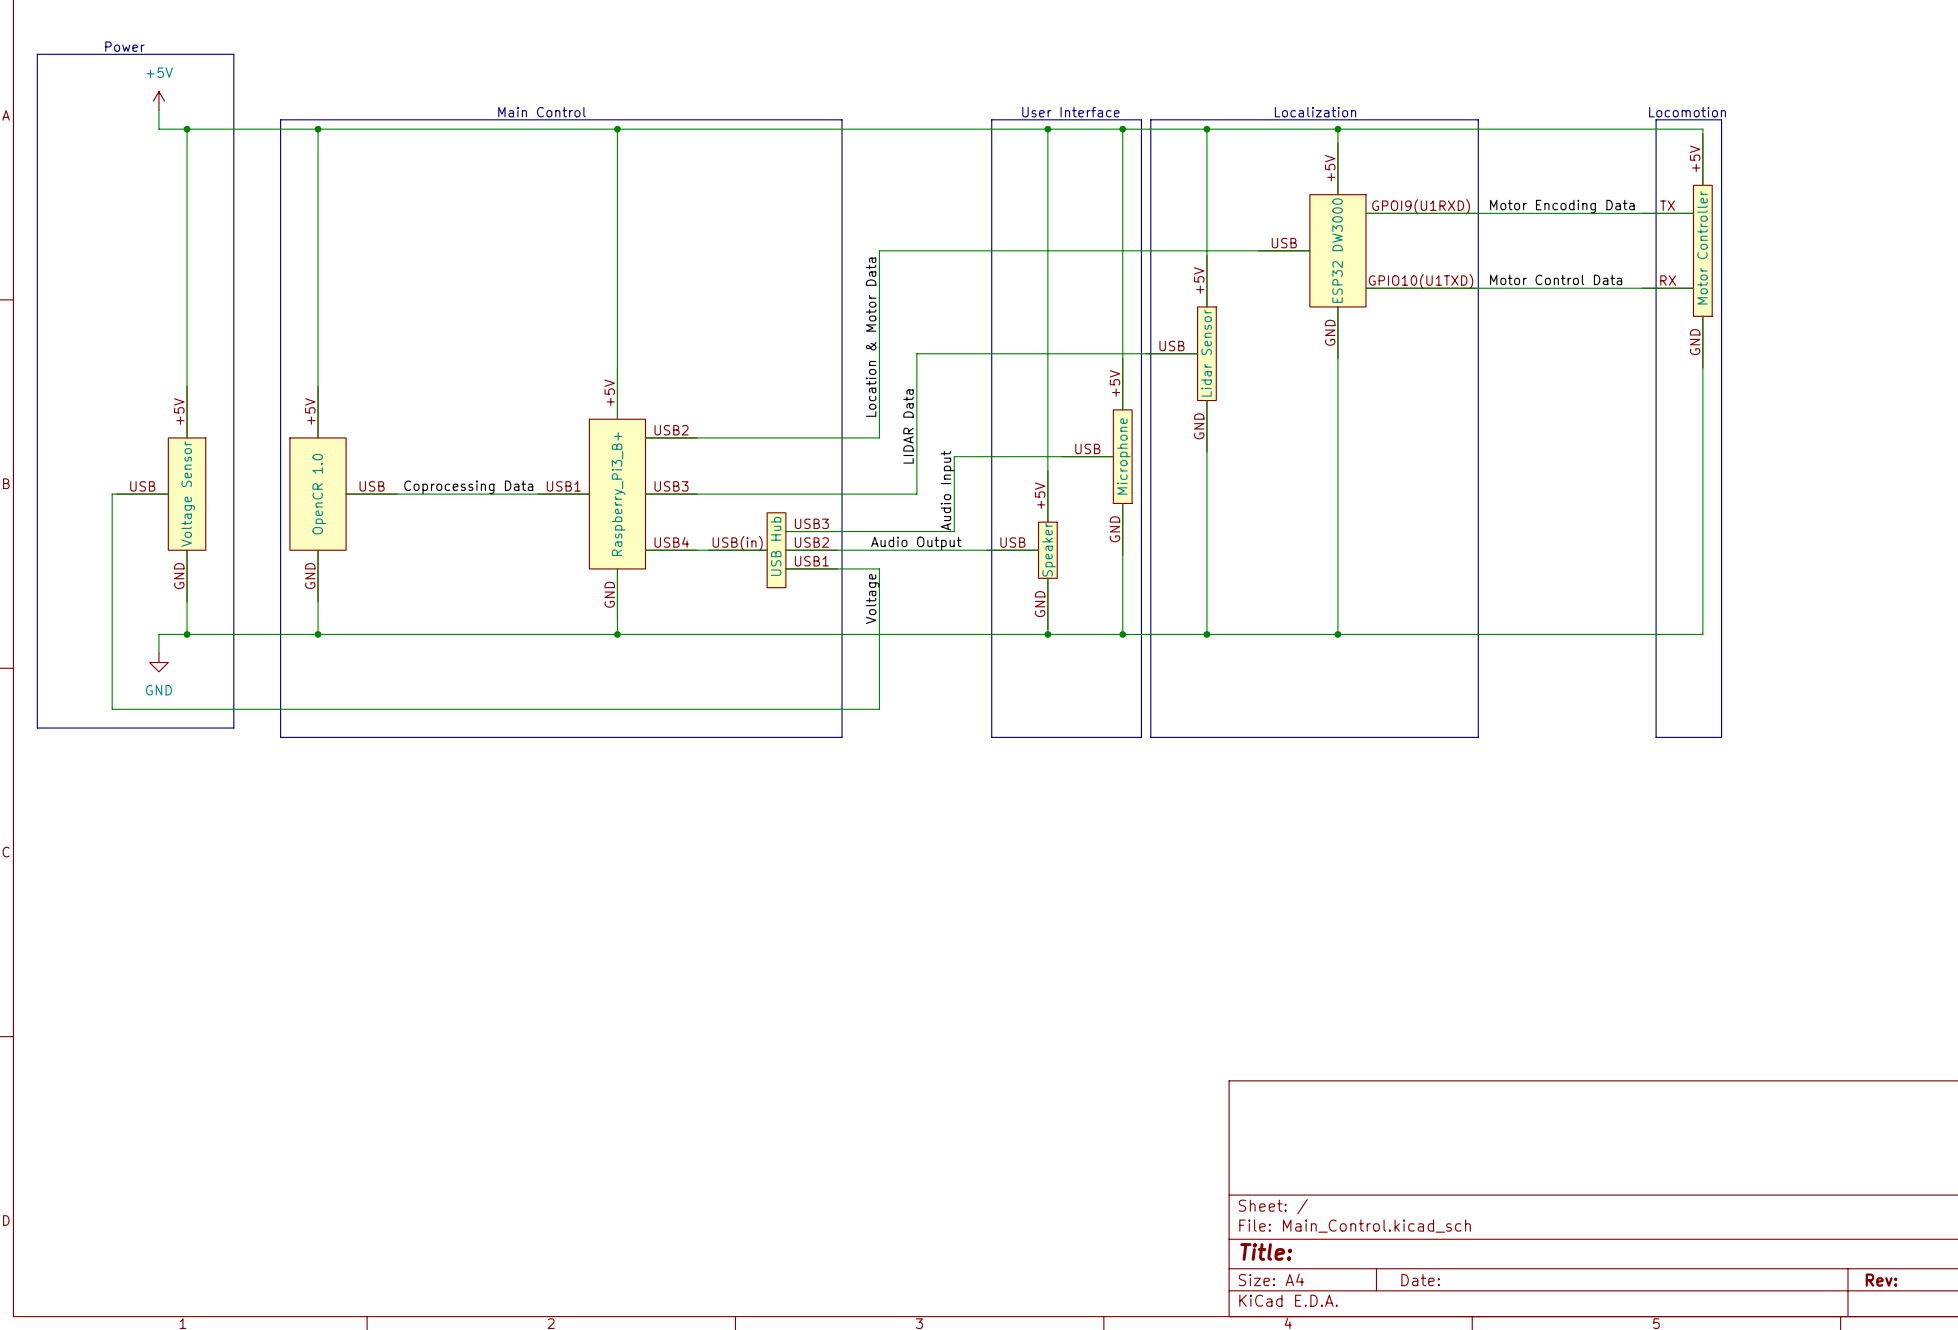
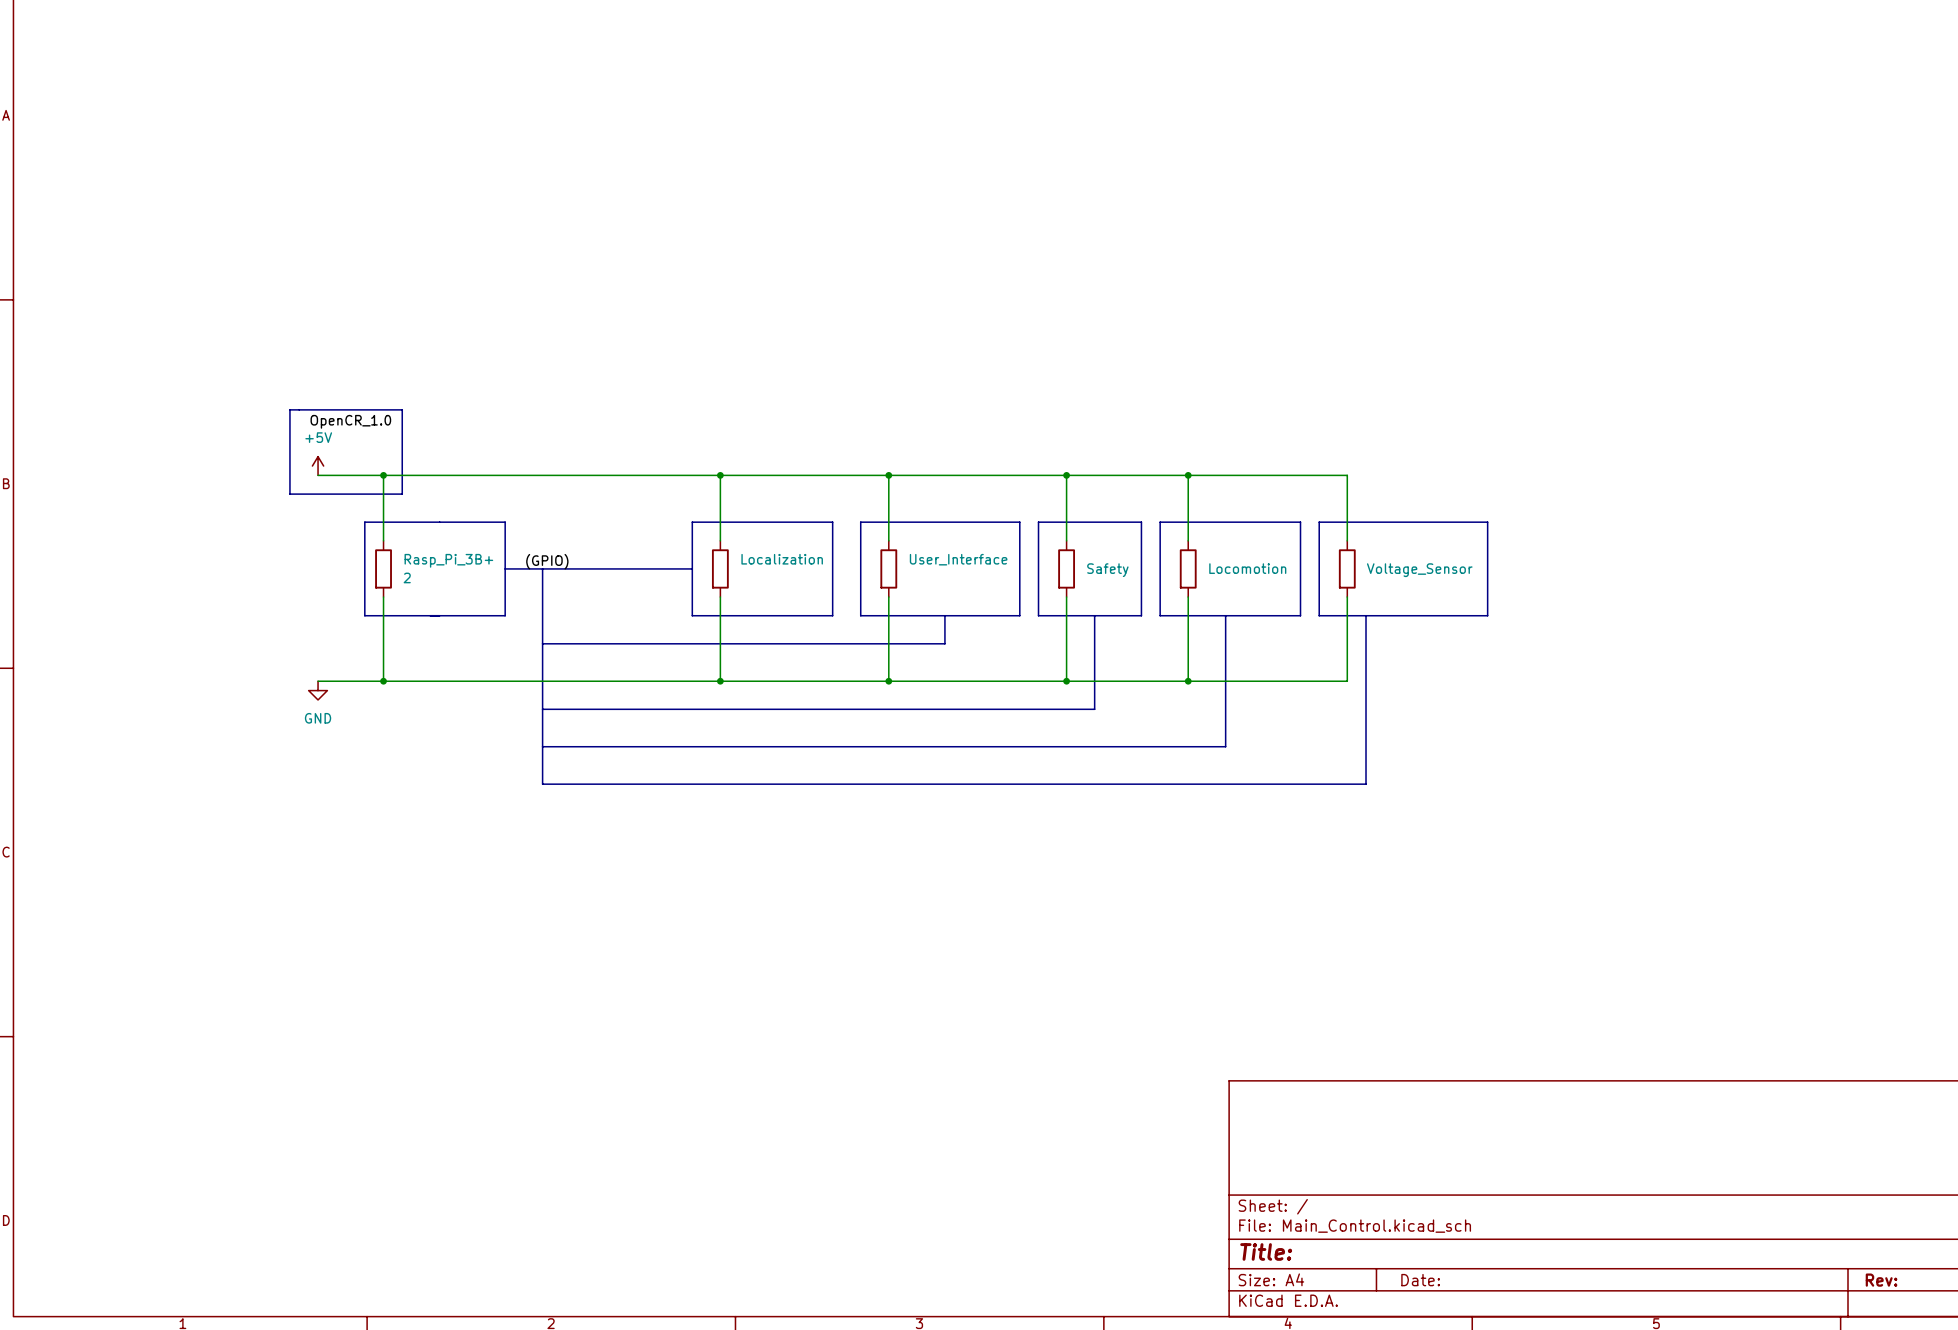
text: Power (124, 46) -> none
line: (37, 54) (233, 54) (233, 728) (37, 728) (37, 54) -> none
power symbol: +5V (158, 101) -> none
wire: (158, 110) (158, 129) (1702, 129) (1702, 185) -> none
text: Main Control (542, 112) -> none
text: User Interface (1070, 112) -> none
text: Localization (1315, 112) -> none
text: Locomotion (1687, 112) -> none
line: (280, 119) (842, 119) (842, 737) (280, 737) (280, 119) -> none
line: (1150, 119) (1478, 119) (1478, 737) (1150, 737) (1150, 119) -> none
line: (1656, 119) (1656, 737) (1721, 737) (1721, 119) (1656, 119) -> none
wire: (187, 129) (187, 437) -> none
junction: (187, 129) -> none
wire: (318, 129) (318, 437) -> none
junction: (318, 129) -> none
wire: (617, 129) (617, 419) -> none
junction: (617, 129) -> none
wire: (1047, 129) (1047, 522) -> none
junction: (1047, 129) -> none
wire: (1122, 129) (1122, 409) -> none
junction: (1122, 129) -> none
wire: (1206, 129) (1206, 306) -> none
junction: (1206, 129) -> none
wire: (1337, 129) (1337, 194) -> none
junction: (1337, 129) -> none
label: Motor Encoding Data (1562, 206) -> none
wire: (1366, 213) (1693, 213) -> none
wire: (1309, 250) (879, 250) (879, 437) (645, 437) -> none
part: ESP32 DW3000 (1367, 250) -> none
part: Motor Controller (1677, 250) -> none
label: Motor Control Data (1556, 279) -> none
wire: (1366, 288) (1693, 288) -> none
wire: (1337, 306) (1337, 634) -> none
wire: (1702, 316) (1702, 634) (158, 634) (158, 653) -> none
label: Location & Motor Data (871, 337) -> none
part: Lidar Sensor (1181, 353) -> none
wire: (1197, 353) (916, 353) (916, 494) (645, 494) -> none
wire: (1206, 400) (1206, 634) -> none
line: none -> (289, 409) (402, 409) (402, 494) (289, 494) (289, 409)
label: none -> OpenCR_1.0 (350, 421)
label: LIDAR Data (908, 426) -> none
part: Microphone (1096, 456) -> none
wire: (1113, 456) (954, 456) (954, 531) (785, 531) -> none
power symbol: none -> +5V (318, 466)
wire: none -> (318, 475) (1347, 475) (1347, 540)
wire: none -> (383, 475) (383, 540)
junction: none -> (383, 475)
junction: none -> (720, 475)
wire: none -> (888, 475) (888, 540)
junction: none -> (888, 475)
wire: none -> (1066, 475) (1066, 540)
junction: none -> (1066, 475)
wire: none -> (1188, 475) (1188, 540)
junction: none -> (1188, 475)
label: Coprocessing Data (468, 487) -> none
label: Audio Input (947, 490) -> none
part: Voltage Sensor (161, 494) -> none
wire: (168, 494) (112, 494) (112, 709) (879, 709) (879, 568) (785, 568) -> none
part: OpenCR 1.0 (343, 494) -> none
wire: (346, 494) (589, 494) -> none
part: Raspberry_Pi3_B+ (617, 494) -> none
wire: (1122, 503) (1122, 634) -> none
line: none -> (364, 522) (364, 615) (505, 615) (505, 522) (364, 522)
line: none -> (692, 522) (832, 522) (832, 615) (692, 615) (692, 522)
line: none -> (860, 522) (1019, 522) (1019, 615) (860, 615) (860, 522)
line: (1141, 522) (1141, 119) (991, 119) (991, 737) (1141, 737) (1141, 615) -> (1141, 522) (1038, 522) (1038, 615) (1141, 615)
line: none -> (1160, 522) (1300, 522) (1300, 615) (1160, 615) (1160, 522)
line: none -> (1319, 522) (1487, 522) (1487, 615) (1319, 615) (1319, 522)
label: Audio Output (916, 543) -> none
wire: (187, 550) (187, 634) -> none
wire: (318, 550) (318, 634) -> (383, 597) (383, 681)
wire: (645, 550) (767, 550) -> none
part: USB Hub (772, 550) -> none
wire: (785, 550) (1038, 550) -> none
part: Speaker (1022, 550) -> none
label: none -> (GPIO) (547, 561)
Rasp_Pi_3B+: none -> 2 (383, 568)
line: none -> (505, 568) (692, 568)
line: none -> (542, 568) (542, 784) (1366, 784) (1366, 615)
wire: (617, 568) (617, 634) -> (720, 475) (720, 540)
Localization: none -> (720, 568)
User_Interface: none -> (888, 568)
Safety: none -> (1066, 568)
Locomotion: none -> (1188, 568)
Voltage_Sensor: none -> (1347, 568)
wire: (1047, 578) (1047, 634) -> none
wire: none -> (720, 597) (720, 681)
wire: none -> (888, 597) (888, 681)
wire: none -> (1066, 597) (1066, 681)
wire: none -> (1188, 597) (1188, 681)
wire: none -> (1347, 597) (1347, 681) (318, 681)
label: Voltage (872, 598) -> none
line: none -> (944, 615) (944, 643) (542, 643)
line: none -> (1094, 615) (1094, 709) (542, 709)
line: none -> (1225, 615) (1225, 746) (542, 746)
junction: (187, 634) -> none
junction: (318, 634) -> none
junction: (617, 634) -> none
junction: (1047, 634) -> none
junction: (1122, 634) -> none
junction: (1206, 634) -> none
junction: (1337, 634) -> none
power symbol position: GND (158, 662) -> GND (318, 690)
junction: none -> (383, 681)
junction: none -> (720, 681)
junction: none -> (888, 681)
junction: none -> (1066, 681)
junction: none -> (1188, 681)

